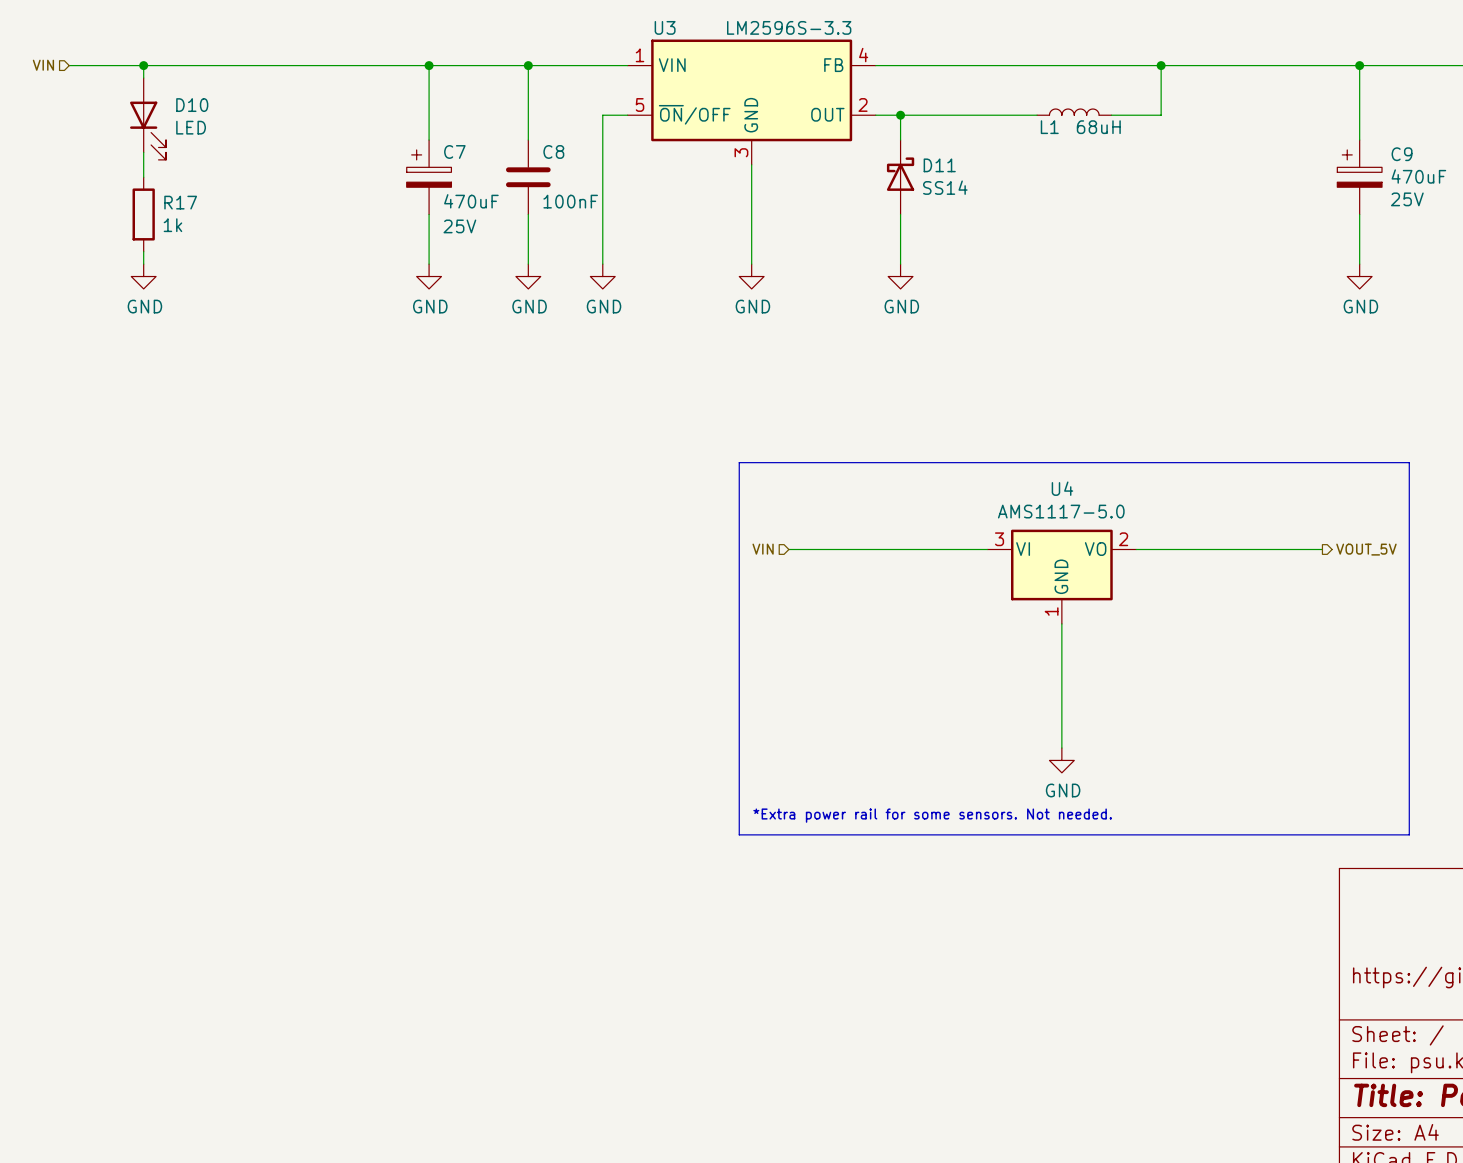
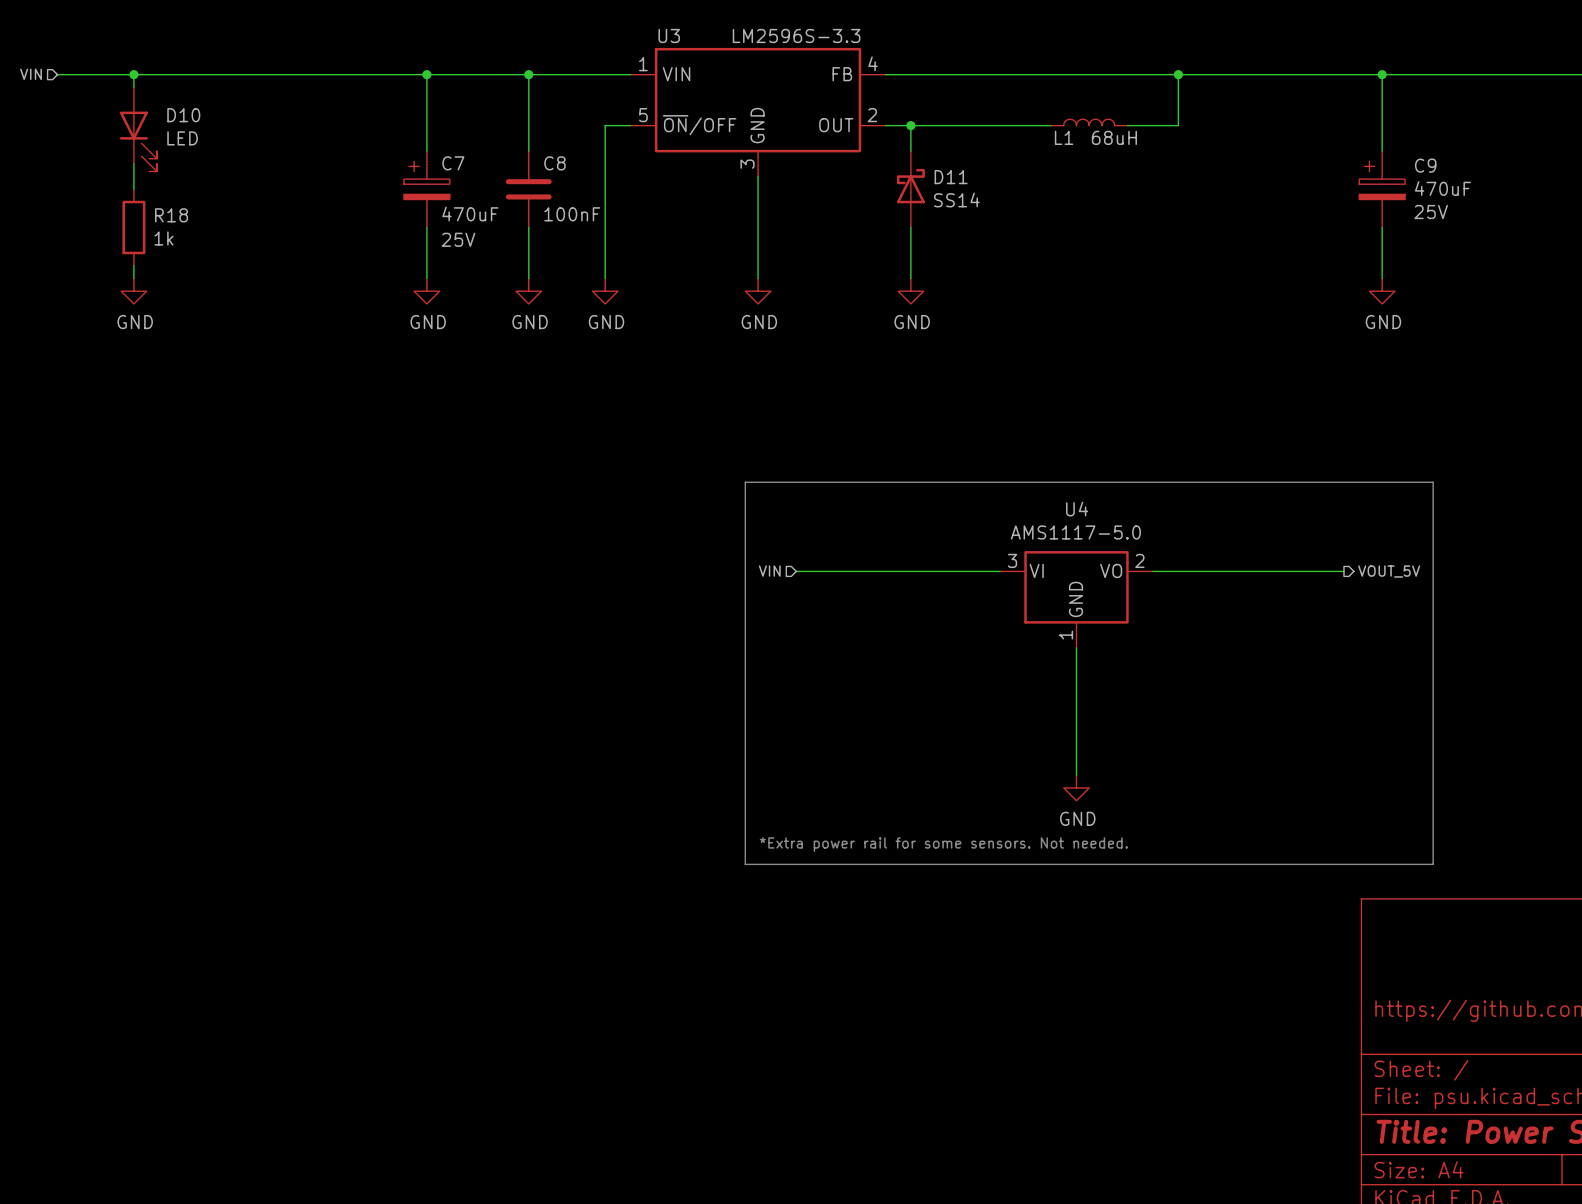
R17 name: R17 (180, 202) -> R18 (171, 215)

